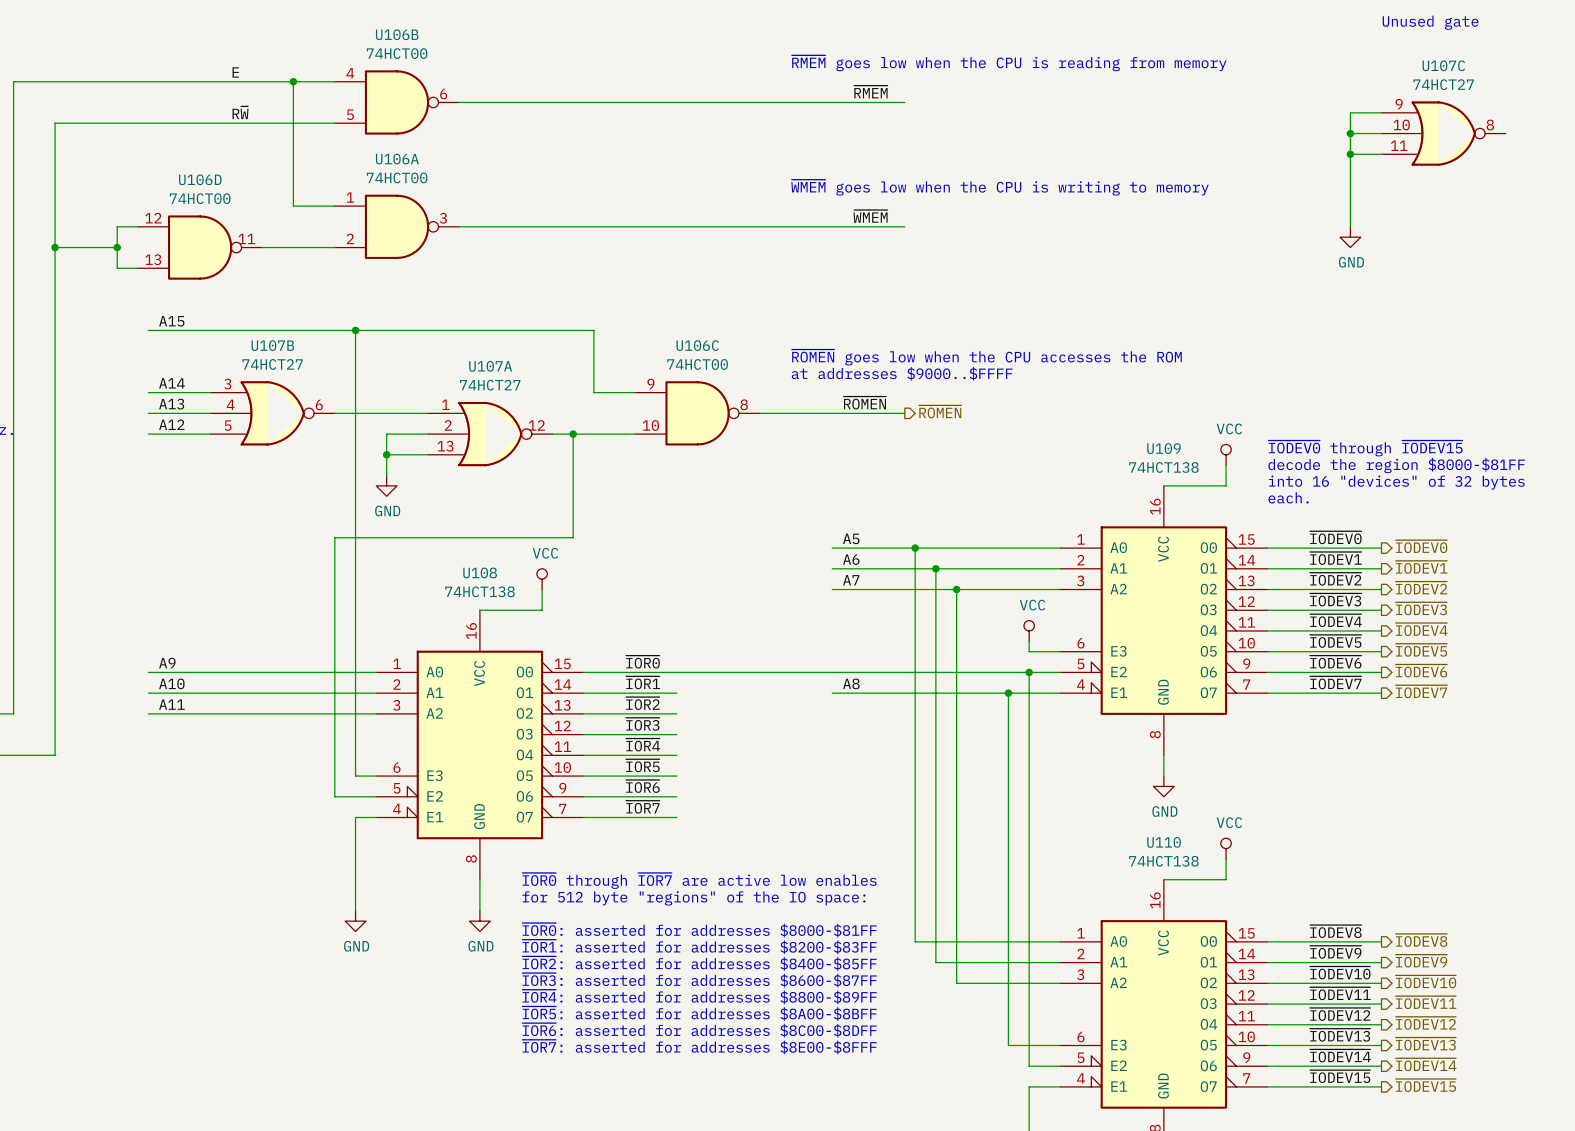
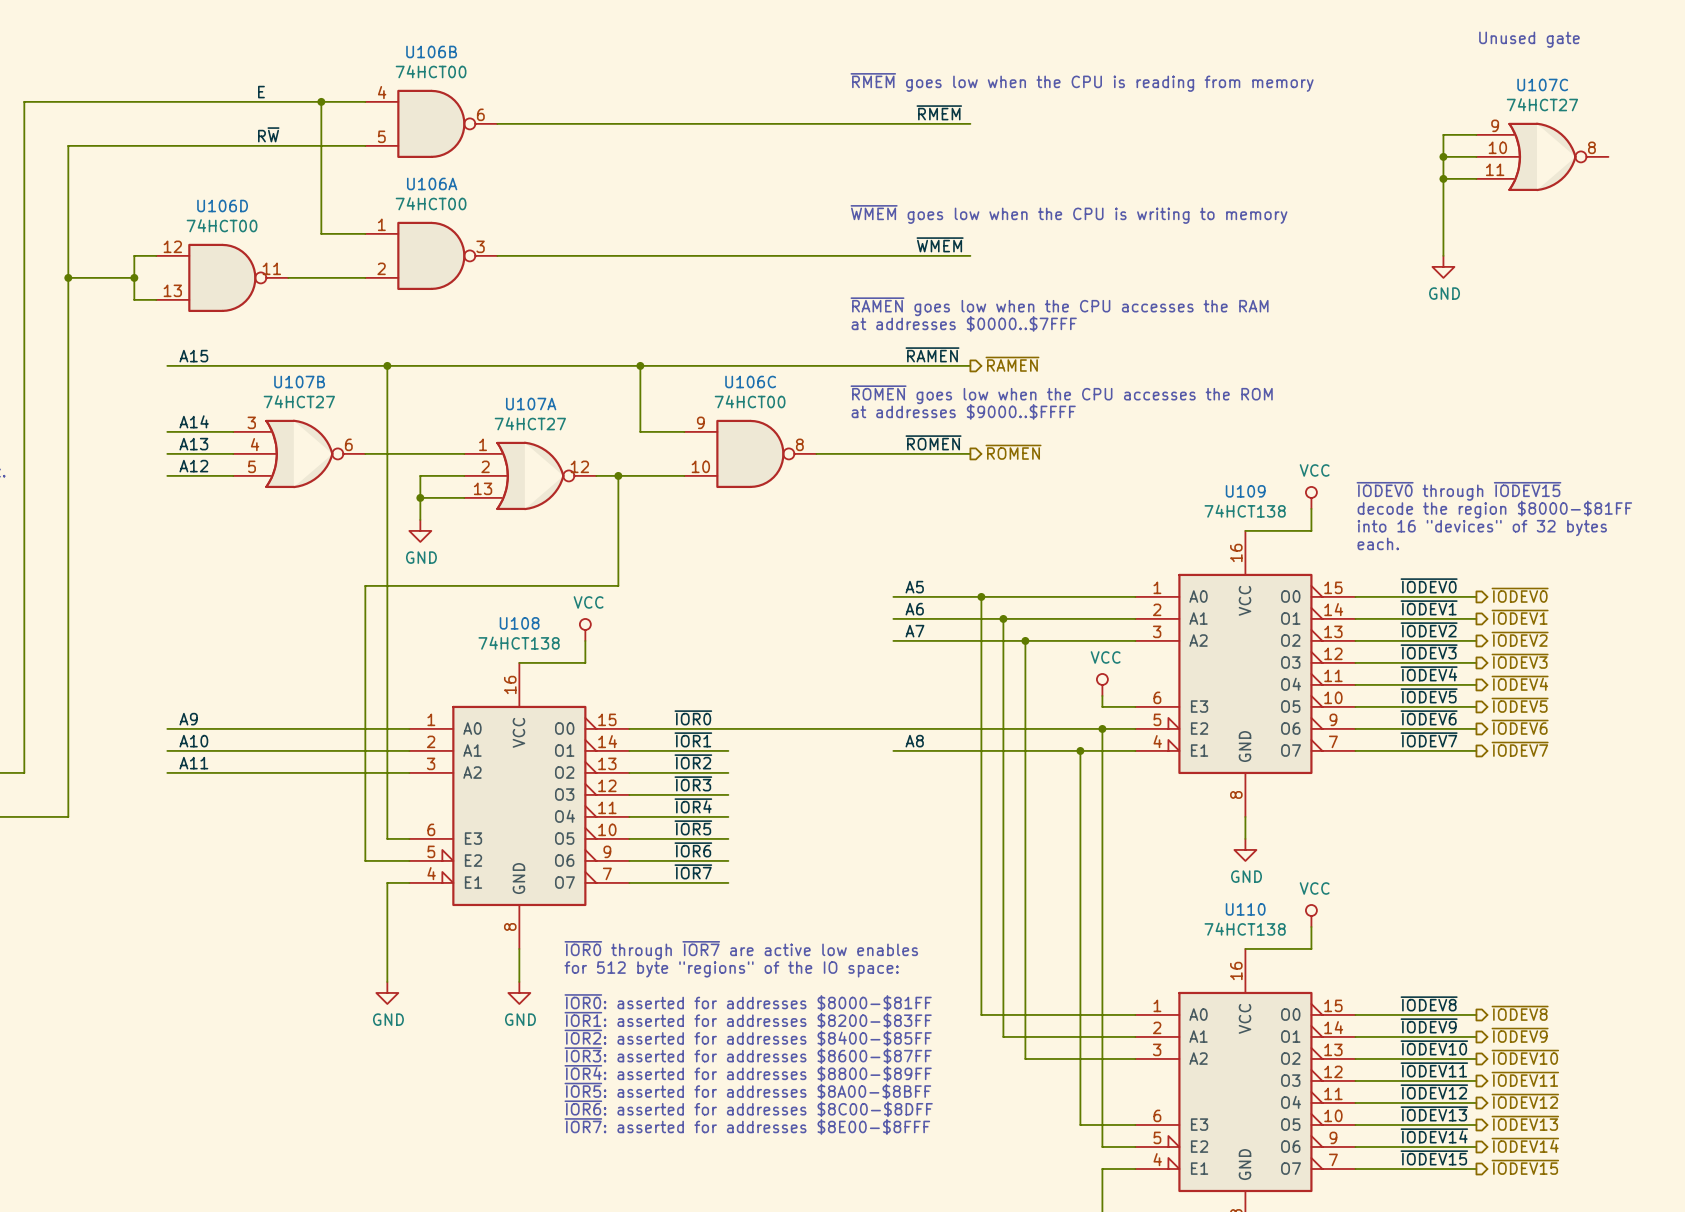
text: none -> ~{RAMEN} goes low when the CPU accesses the RAM (1059, 306)
text: none -> at addresses $0000..$7FFF (964, 323)
label: none -> ~{RAMEN} (932, 354)
hierarchical label: none -> ~{RAMEN} (1012, 364)
wire: none -> (640, 365) (970, 365)
junction: none -> (640, 365)

